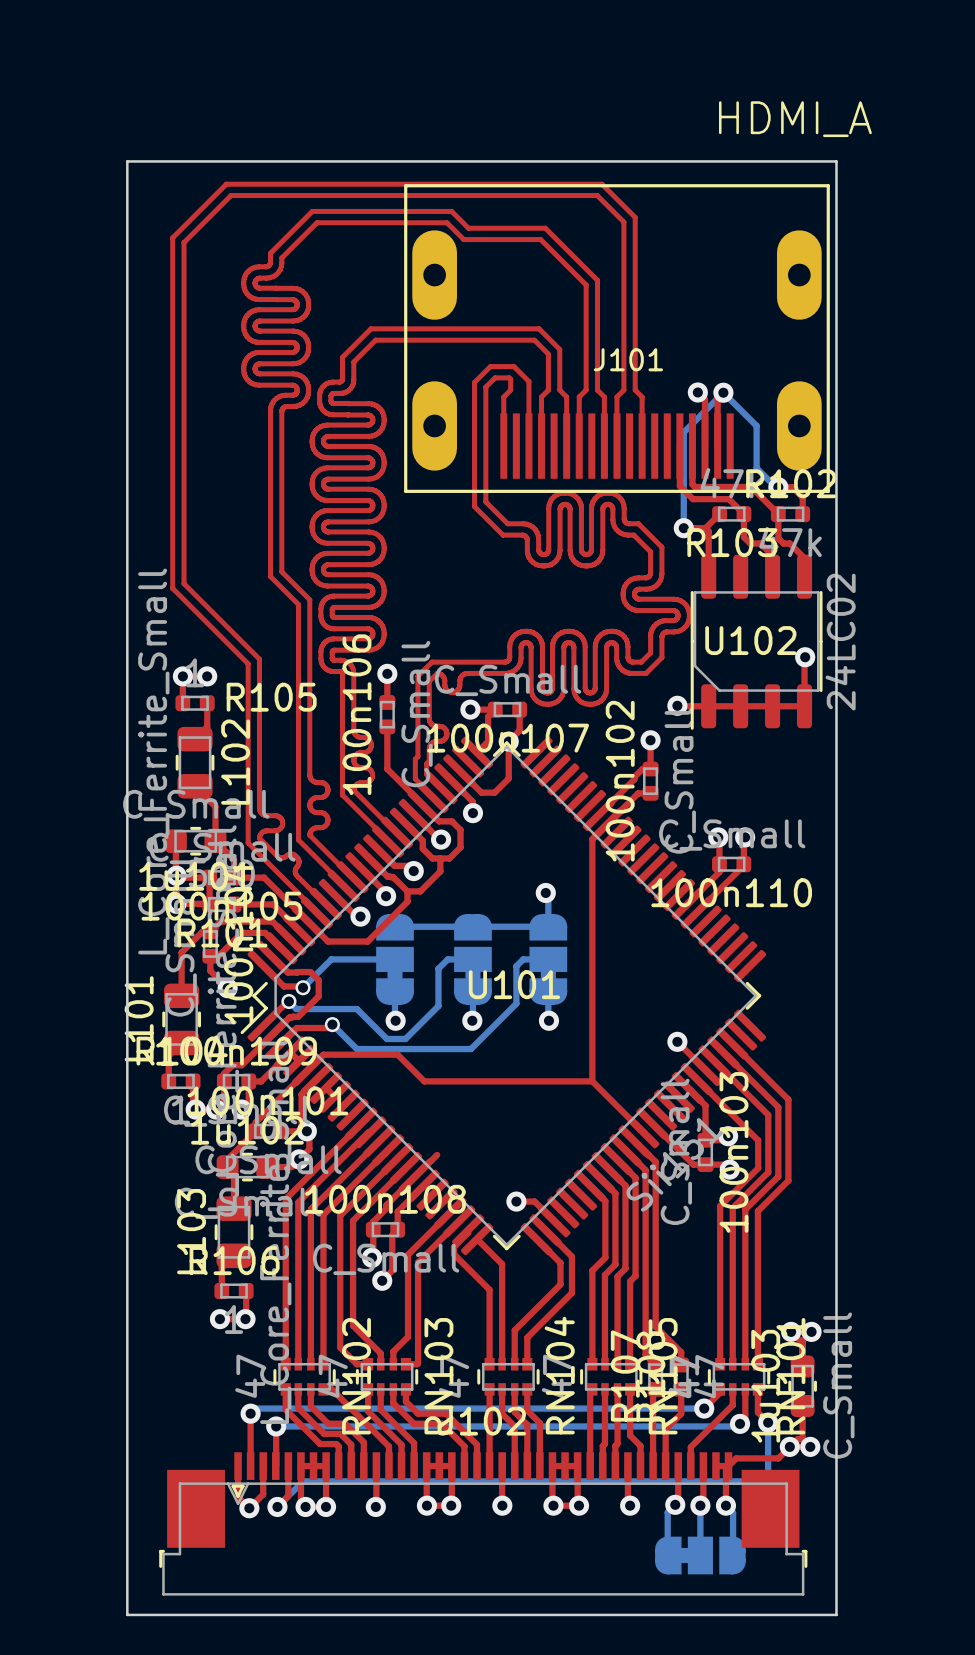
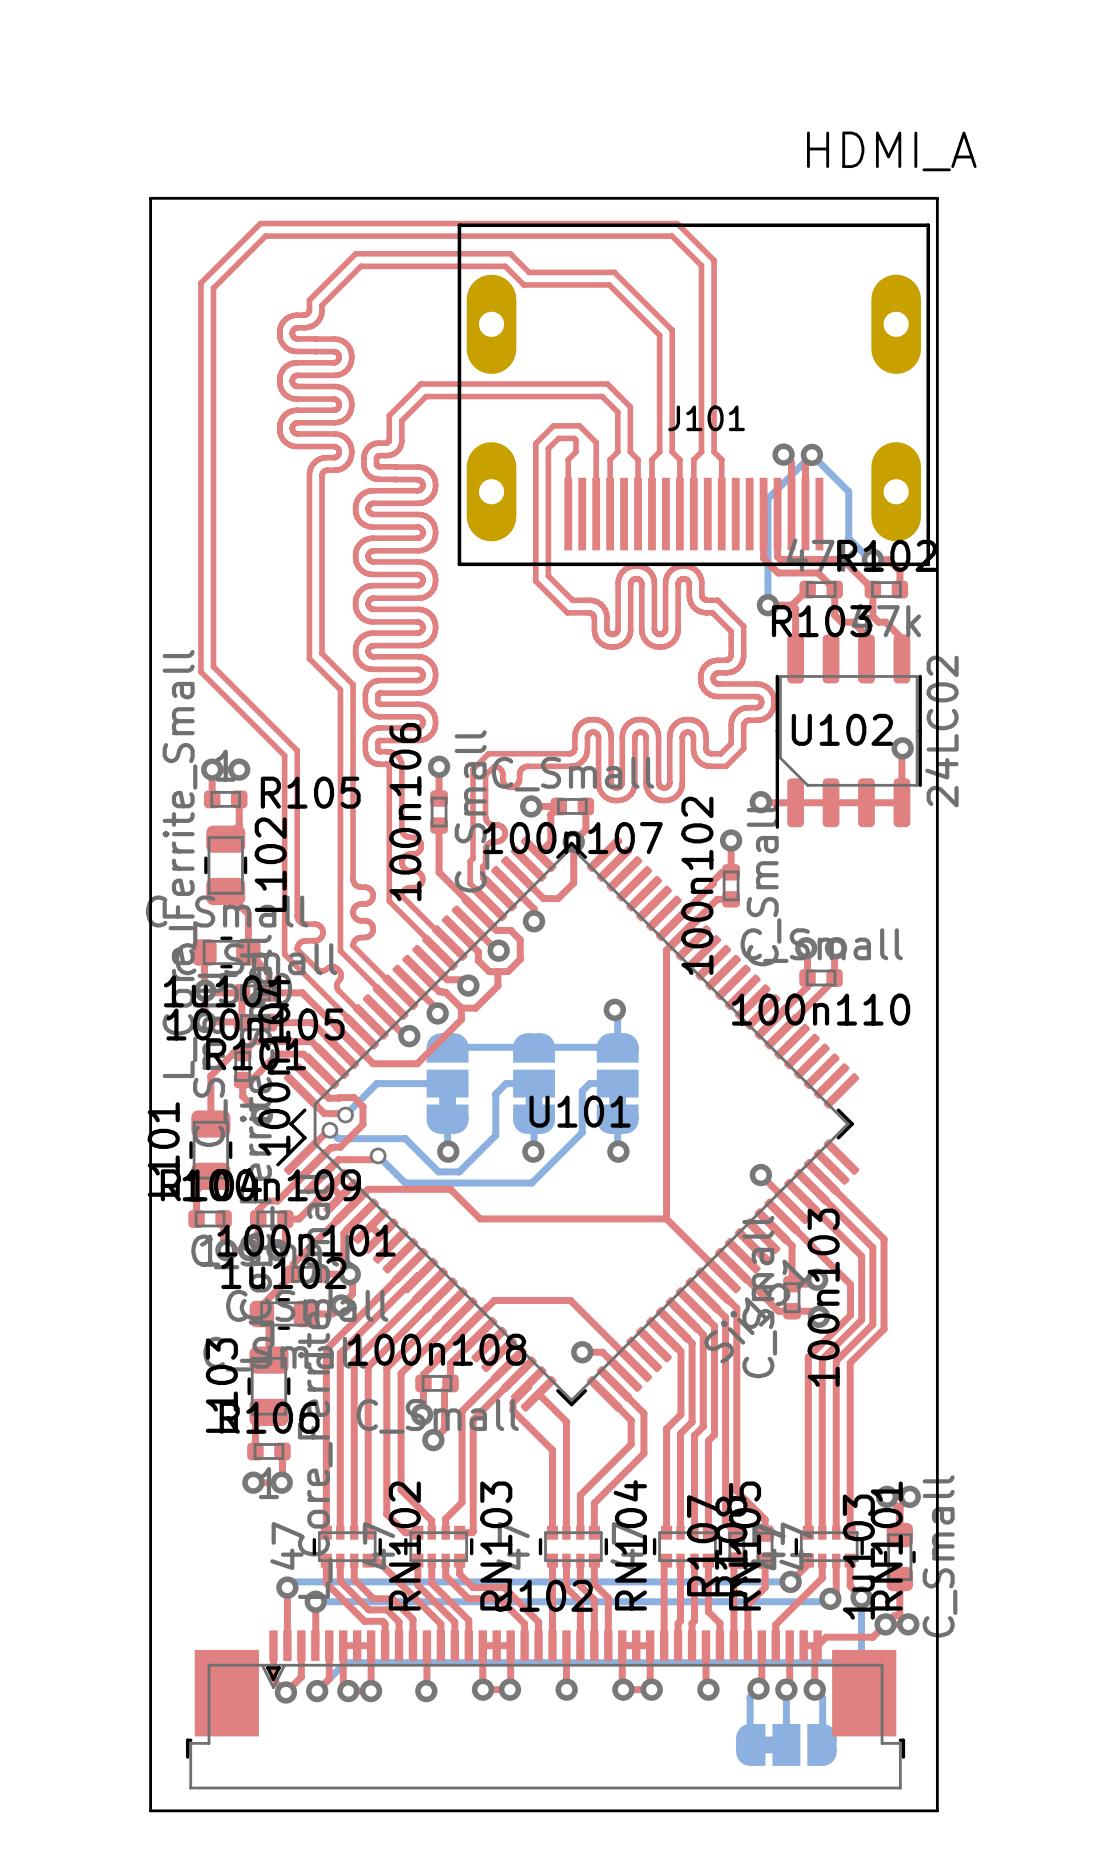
top track: none -> (494, 1300) (570, 1300) (634, 1364)

